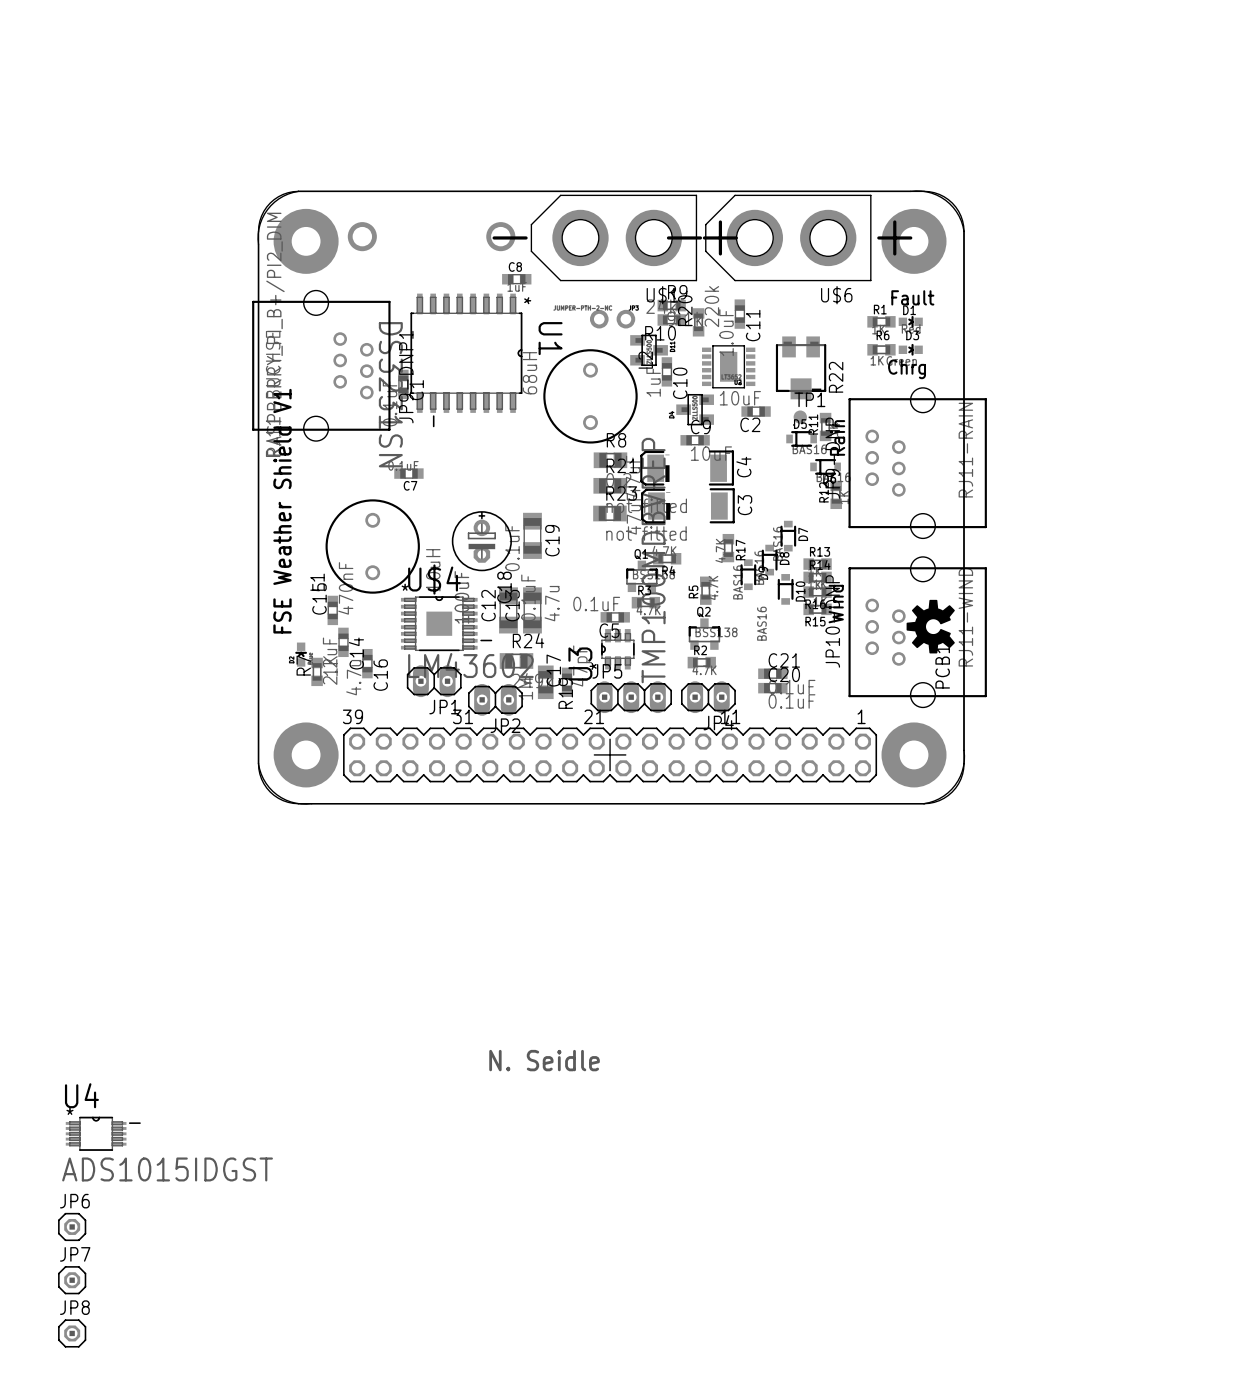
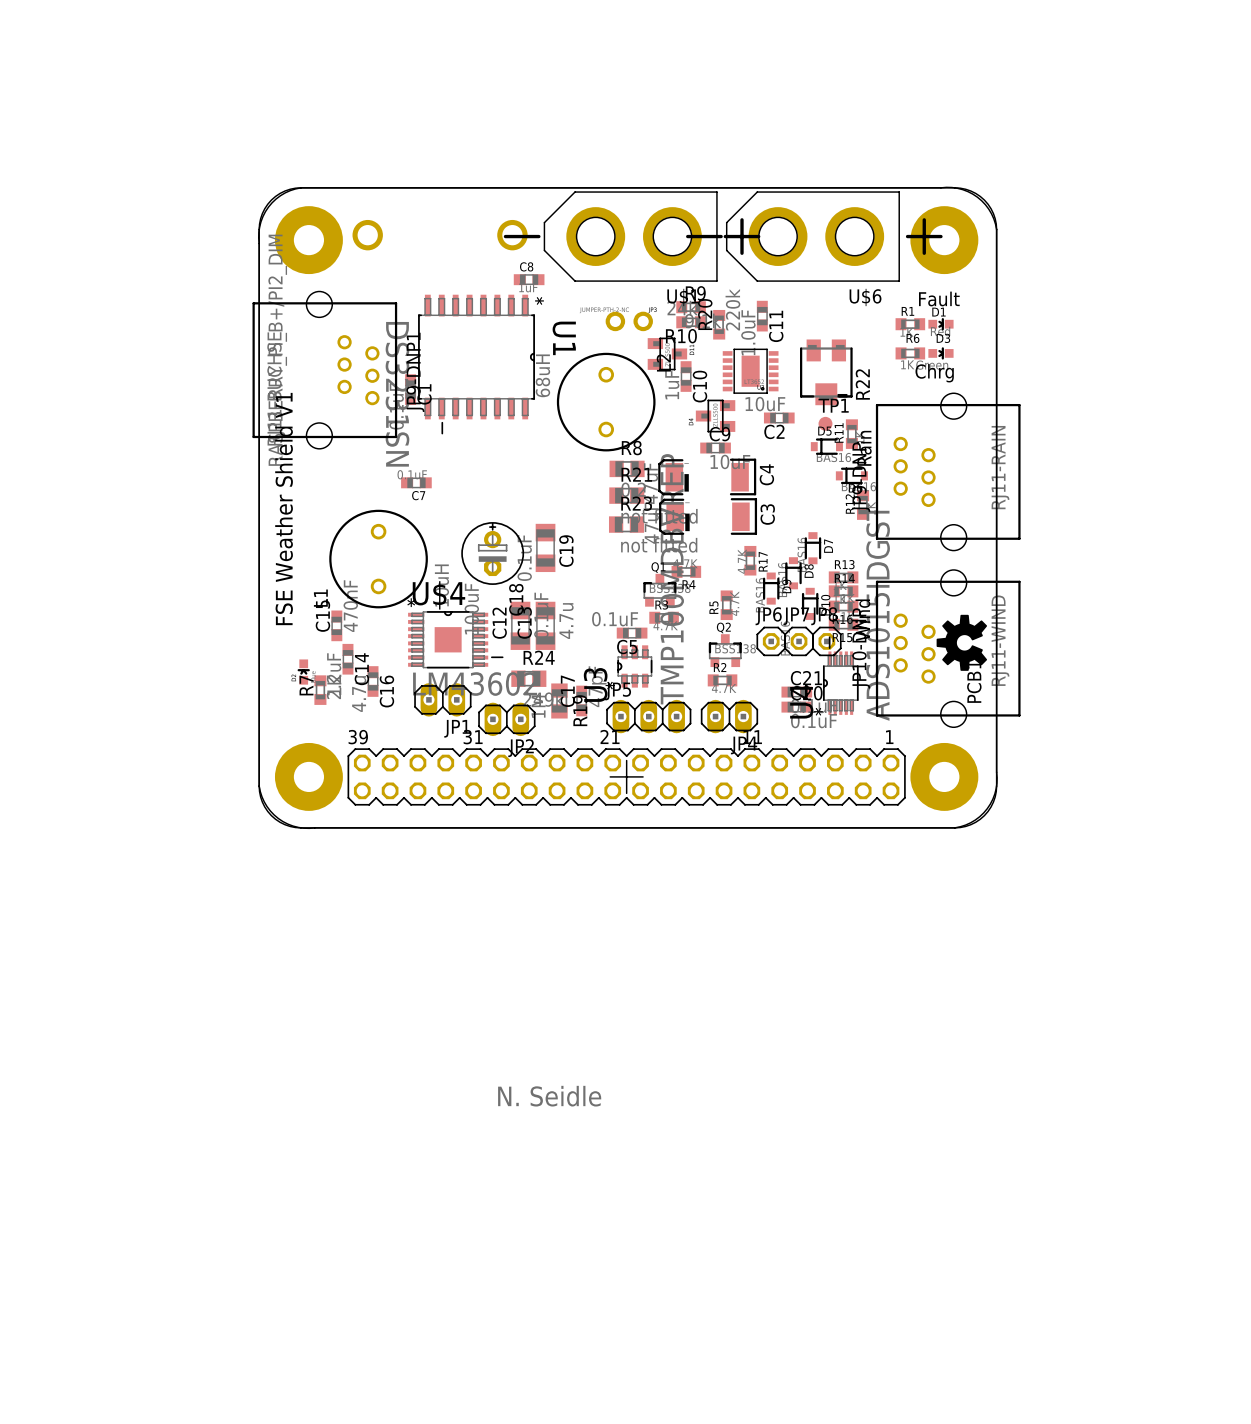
U4 rotation: 0° (103, 1133) -> 90° counterclockwise (840, 675)
U4 position: (103, 1133) -> (840, 675)
JP6 position: (72, 1226) -> (771, 641)
JP7 position: (72, 1280) -> (799, 641)
JP8 position: (72, 1333) -> (826, 641)

